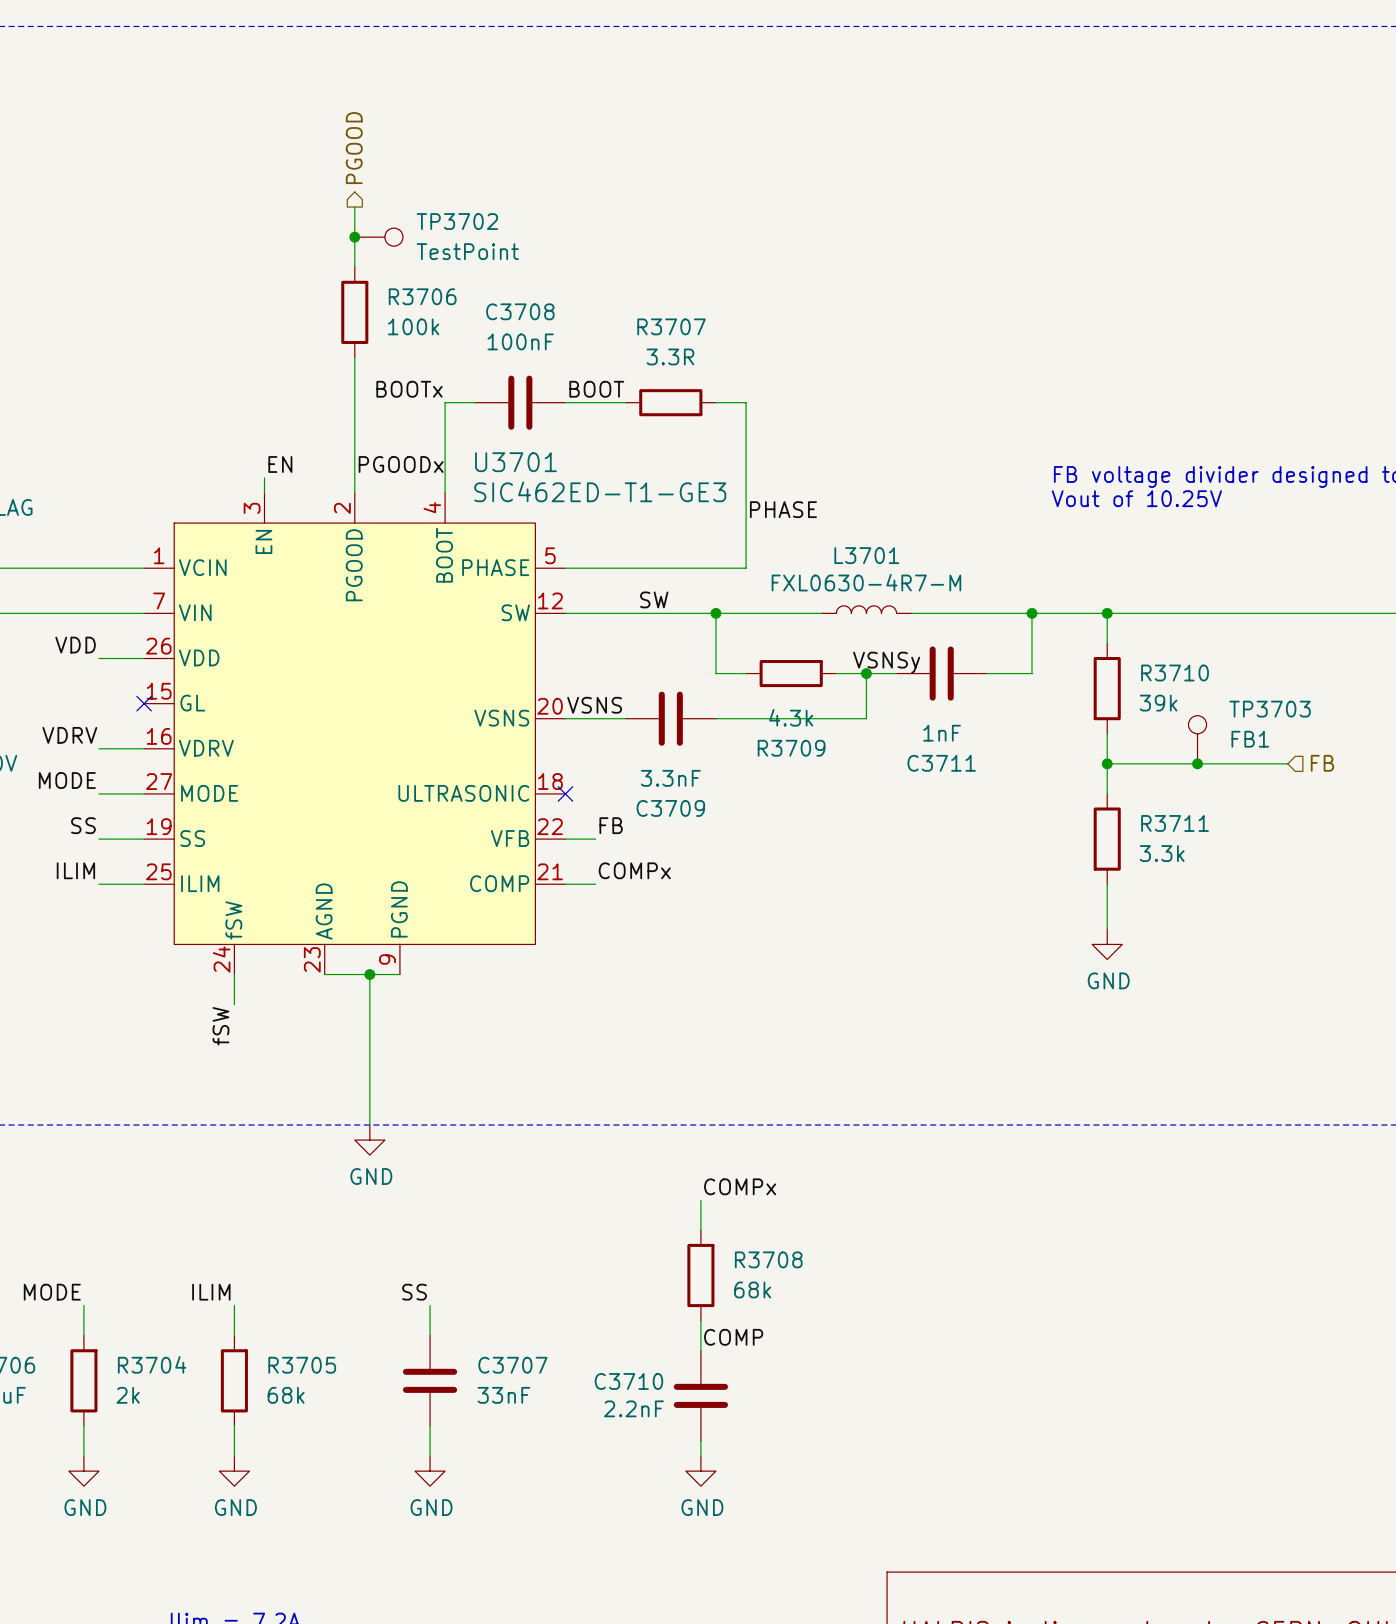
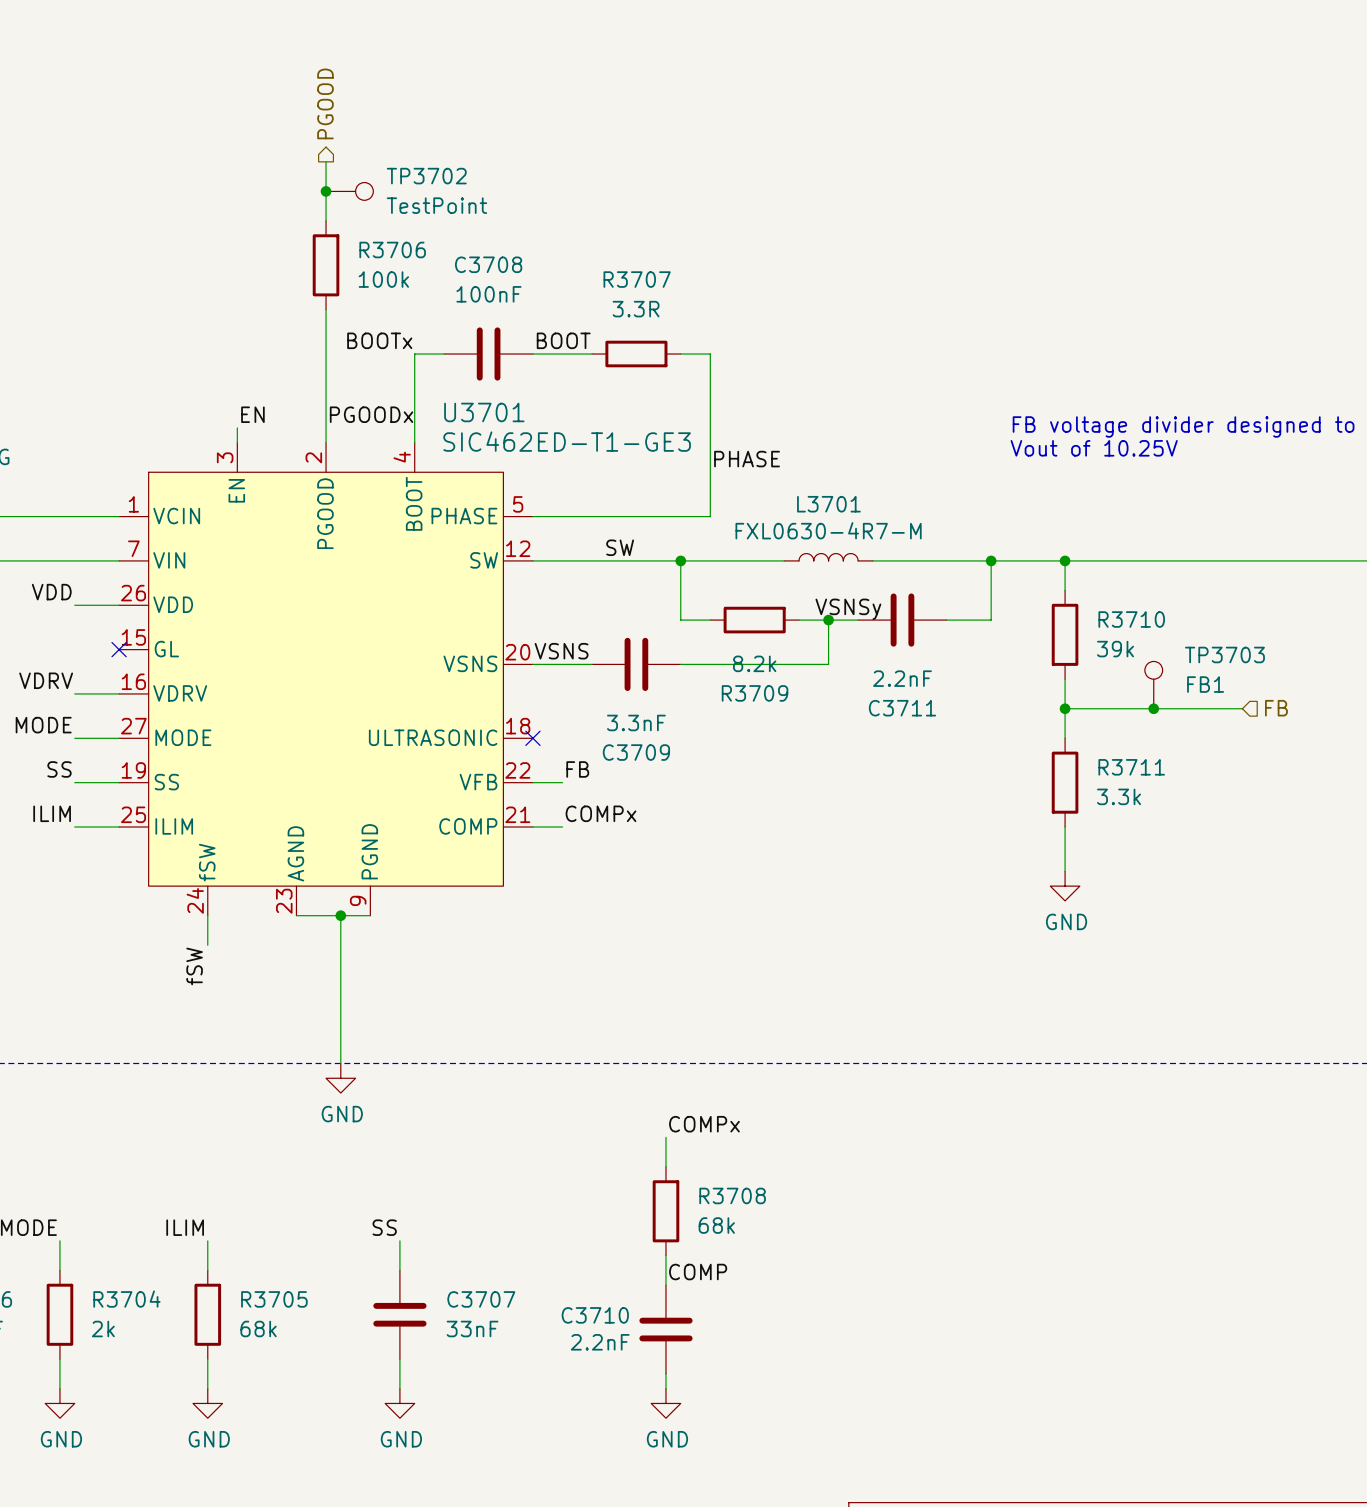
R3709 value: 4.3k (791, 717) -> 8.2k (754, 663)
C3711 value: 1nF (942, 733) -> 2.2nF (902, 678)

